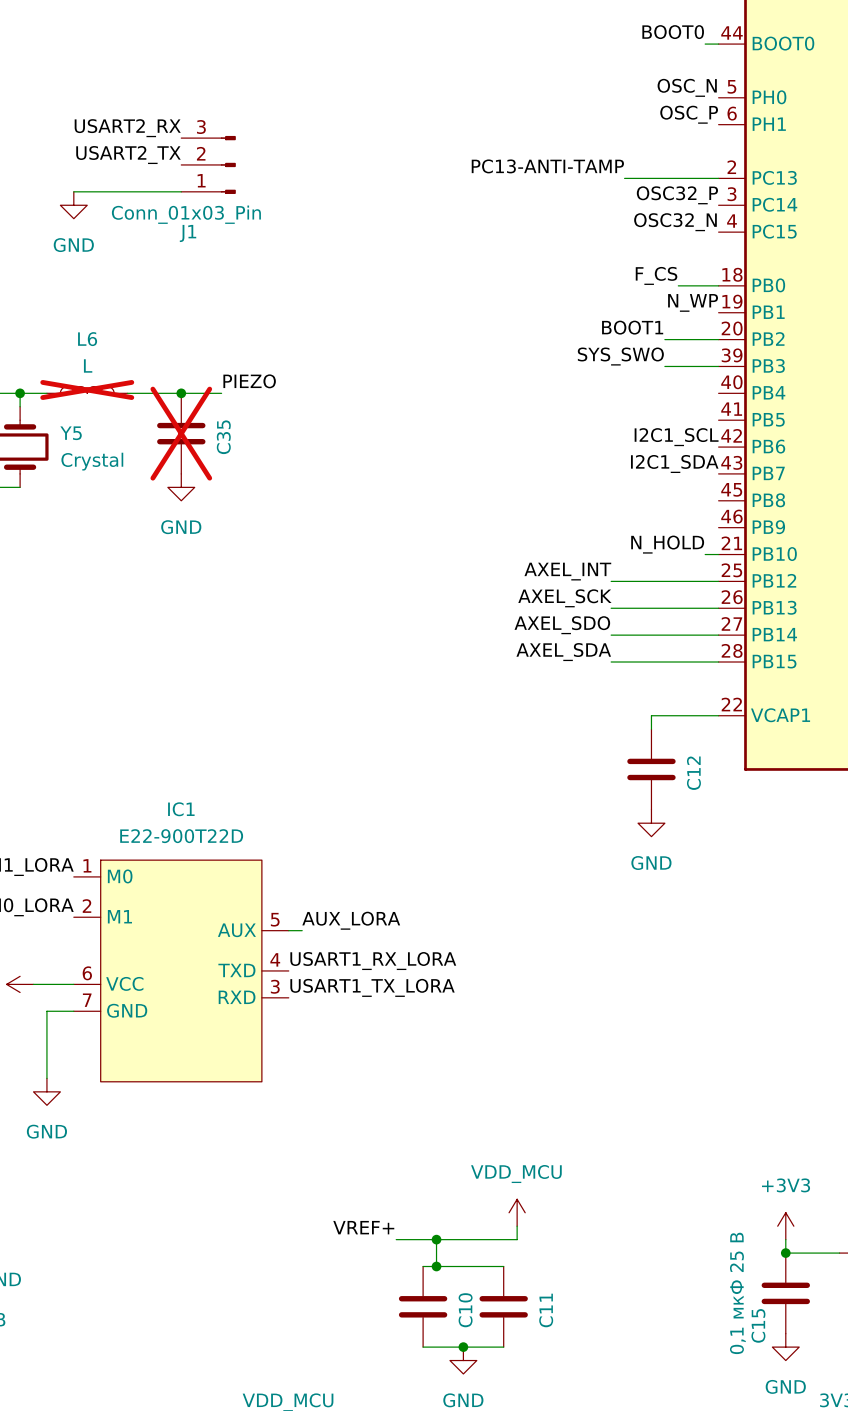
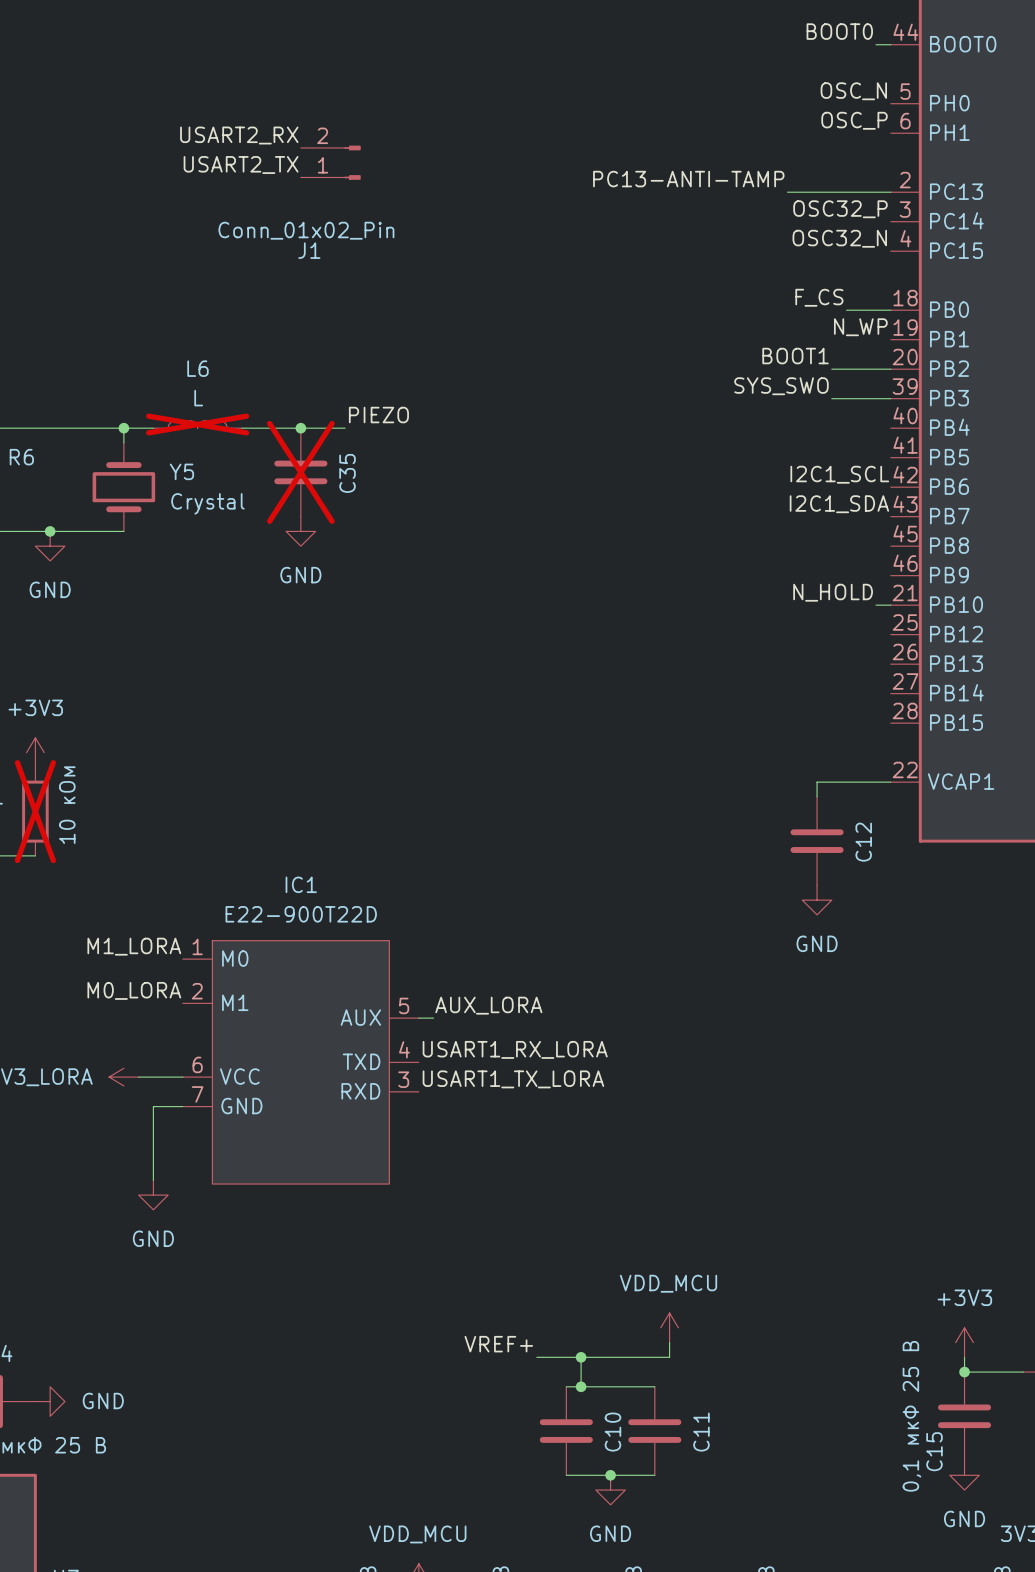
J1 symbol: [181, 135, 236, 194] -> [300, 145, 361, 180]
wire: (73, 191) (181, 191) -> none
power symbol: GND (73, 205) -> none
J1 value: Conn_01x03_Pin (186, 214) -> Conn_01x02_Pin (306, 230)
label: AXEL_INT (567, 571) -> none
wire: (611, 581) (718, 581) -> none
label: AXEL_SCK (564, 598) -> none
wire: (611, 608) (718, 608) -> none
label: AXEL_SDO (562, 625) -> none
wire: (611, 635) (718, 635) -> none
label: AXEL_SDA (563, 652) -> none
wire: (611, 662) (718, 662) -> none

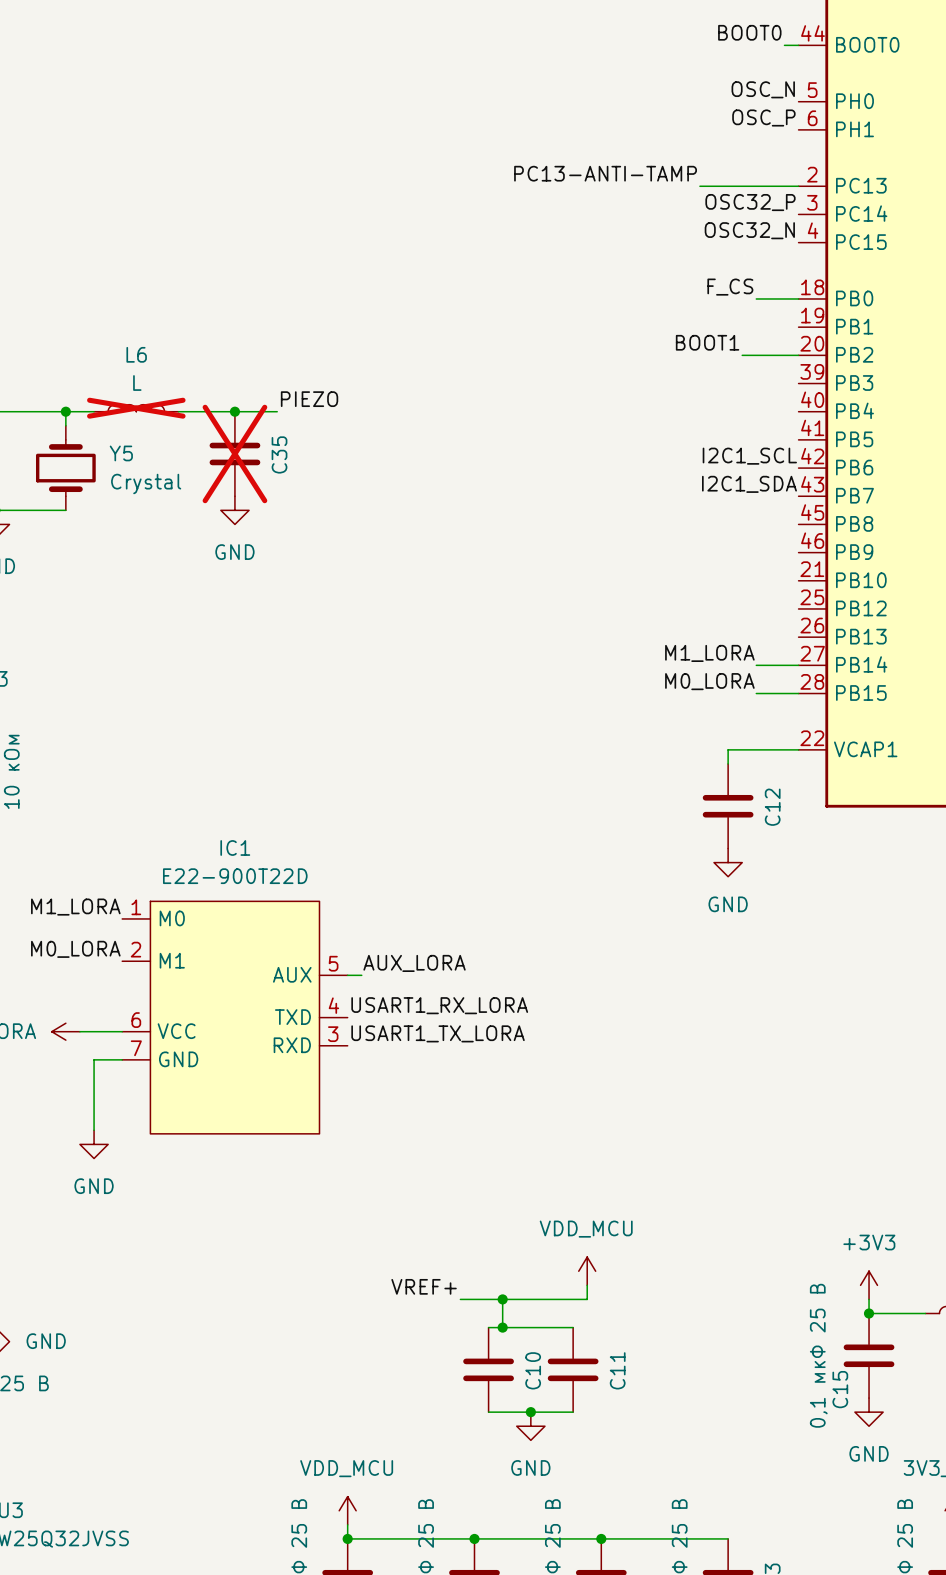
label: USART2_RX (239, 135) -> none
J1: Conn_01x02_Pin (330, 162) -> none
label: USART2_TX (241, 165) -> none
label: N_WP (860, 327) -> none
label: SYS_SWO (781, 386) -> none
wire: (831, 398) (890, 398) -> none
label: N_HOLD (833, 592) -> none
wire: (876, 605) (890, 605) -> none
label: none -> M1_LORA (709, 653)
wire: none -> (756, 665) (798, 665)
label: none -> M0_LORA (709, 681)
wire: none -> (756, 693) (798, 693)

